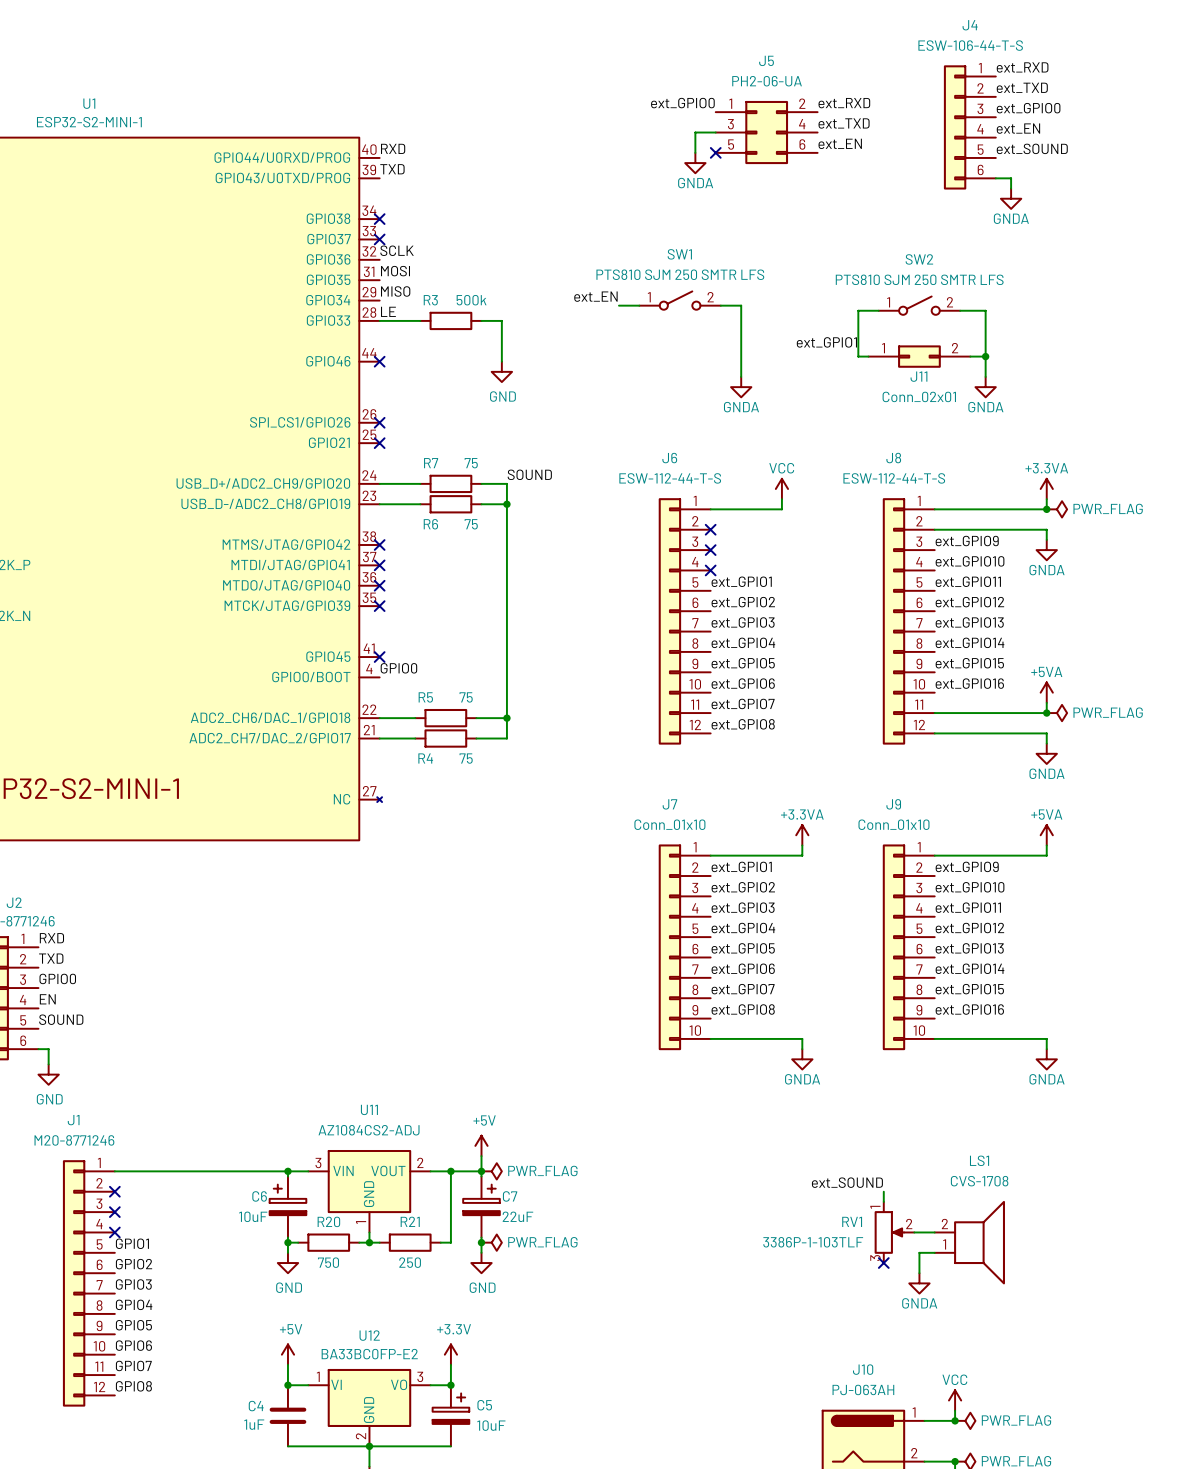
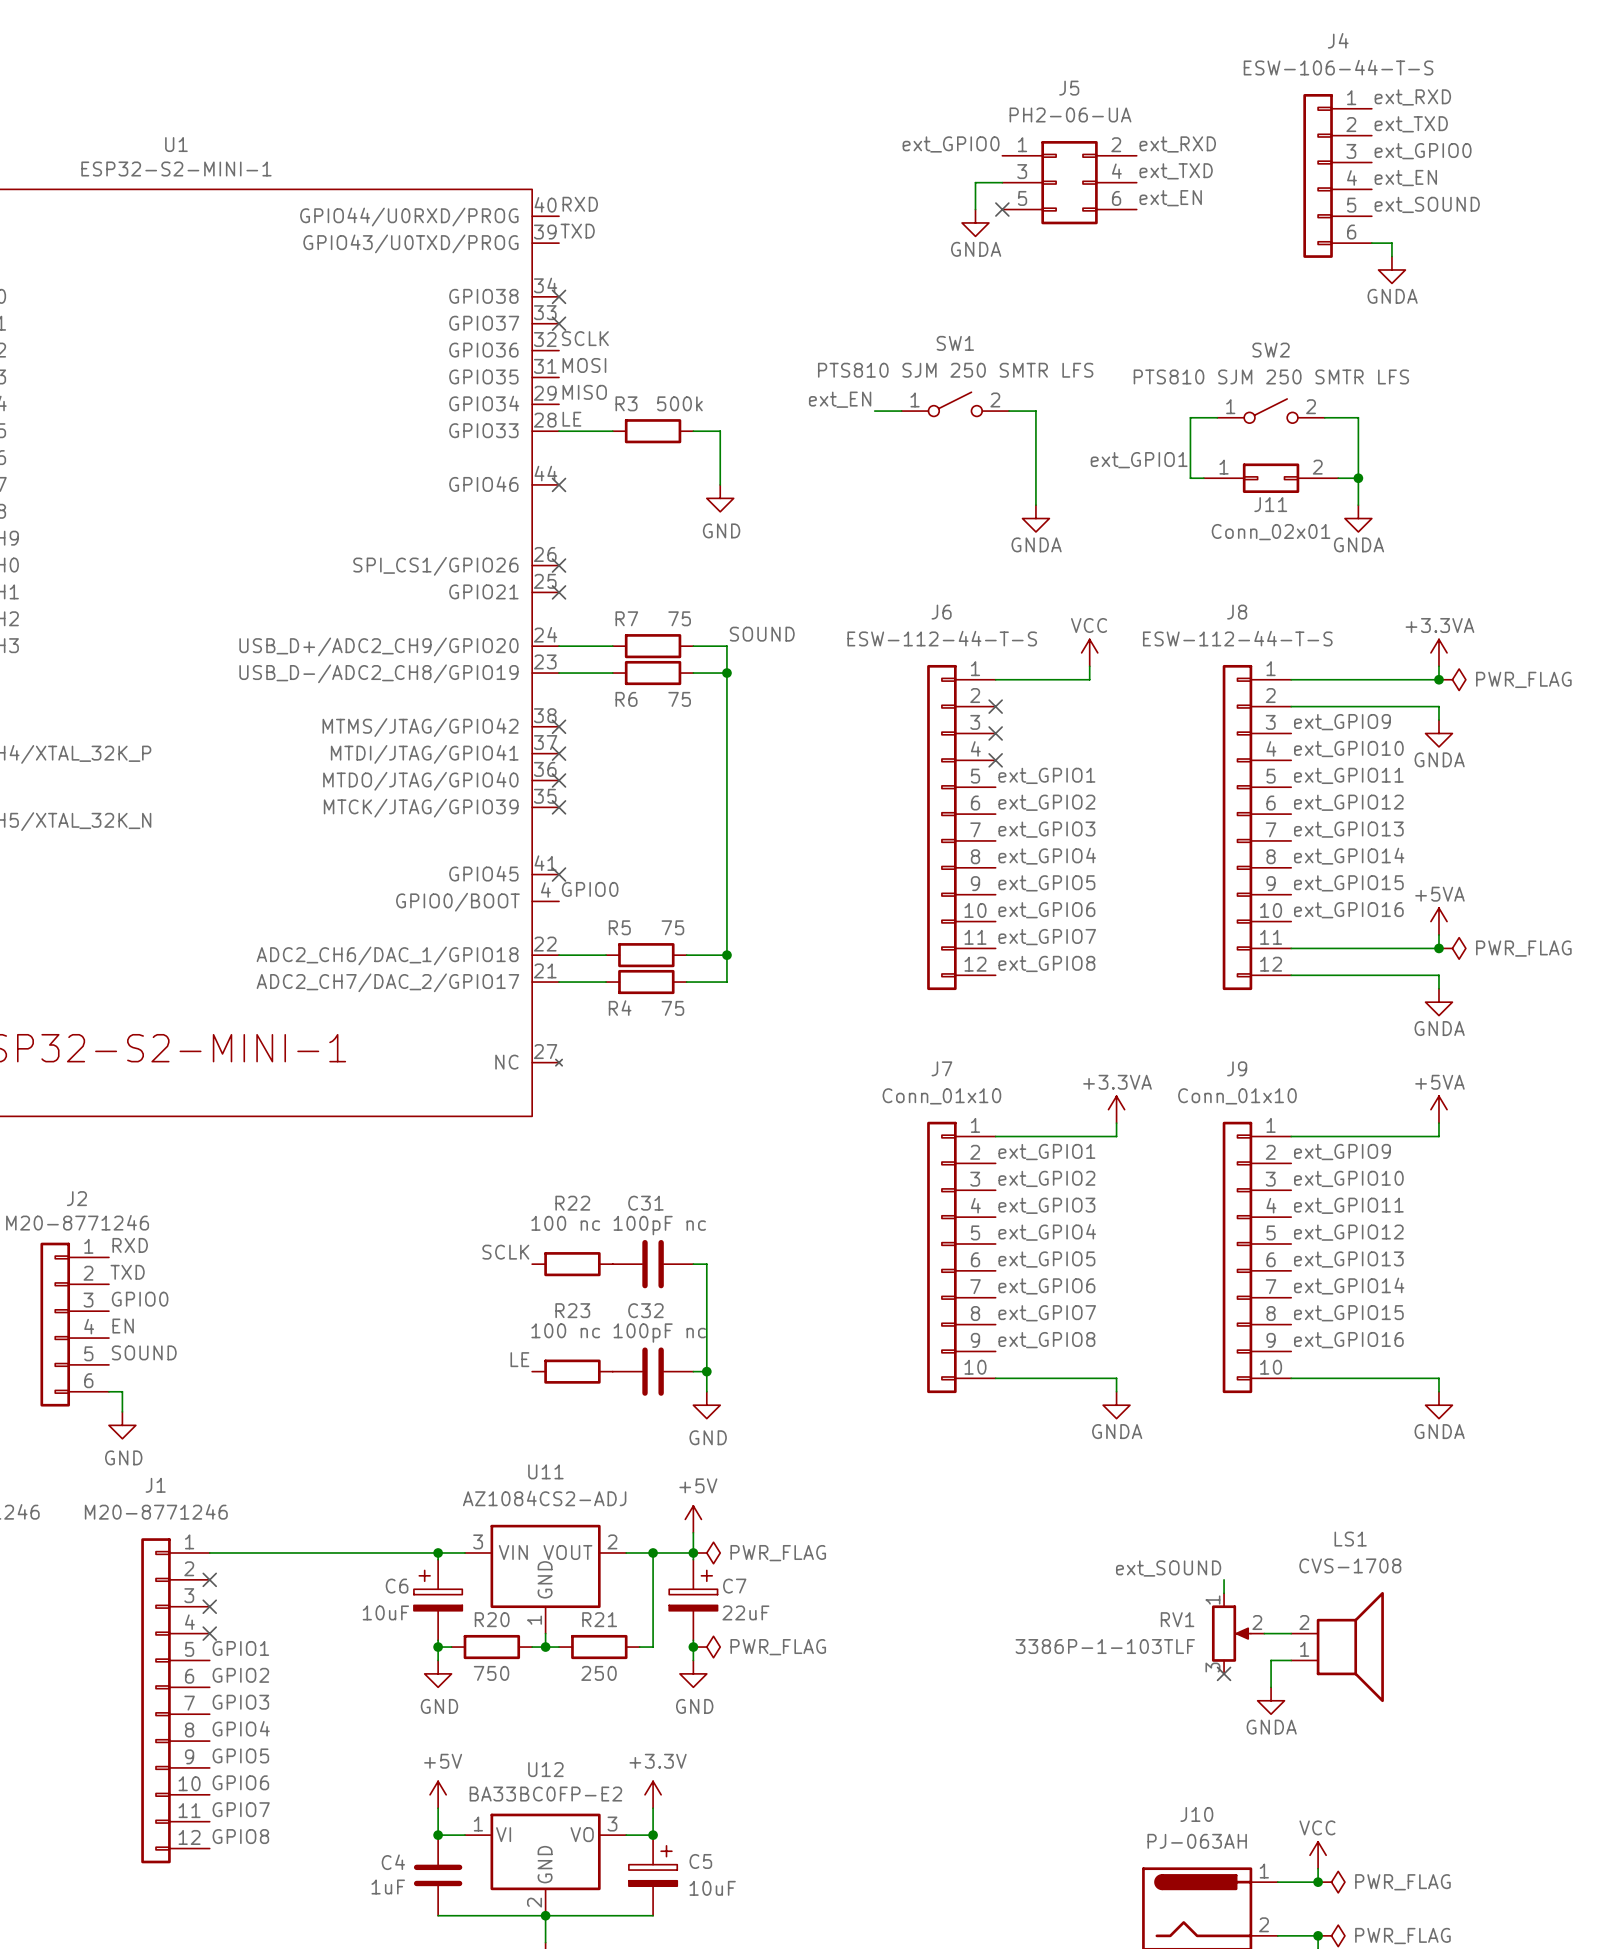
label: none -> SCLK (505, 1252)
R22: none -> 100 nc (572, 1264)
C31: none -> 100pF nc (653, 1264)
wire: none -> (693, 1264) (706, 1264) (706, 1391)
label: none -> LE (519, 1359)
R23: none -> 100 nc (572, 1371)
C32: none -> 100pF nc (653, 1371)
wire: none -> (693, 1371) (706, 1371)
junction: none -> (706, 1371)
power symbol: none -> GND (706, 1405)

